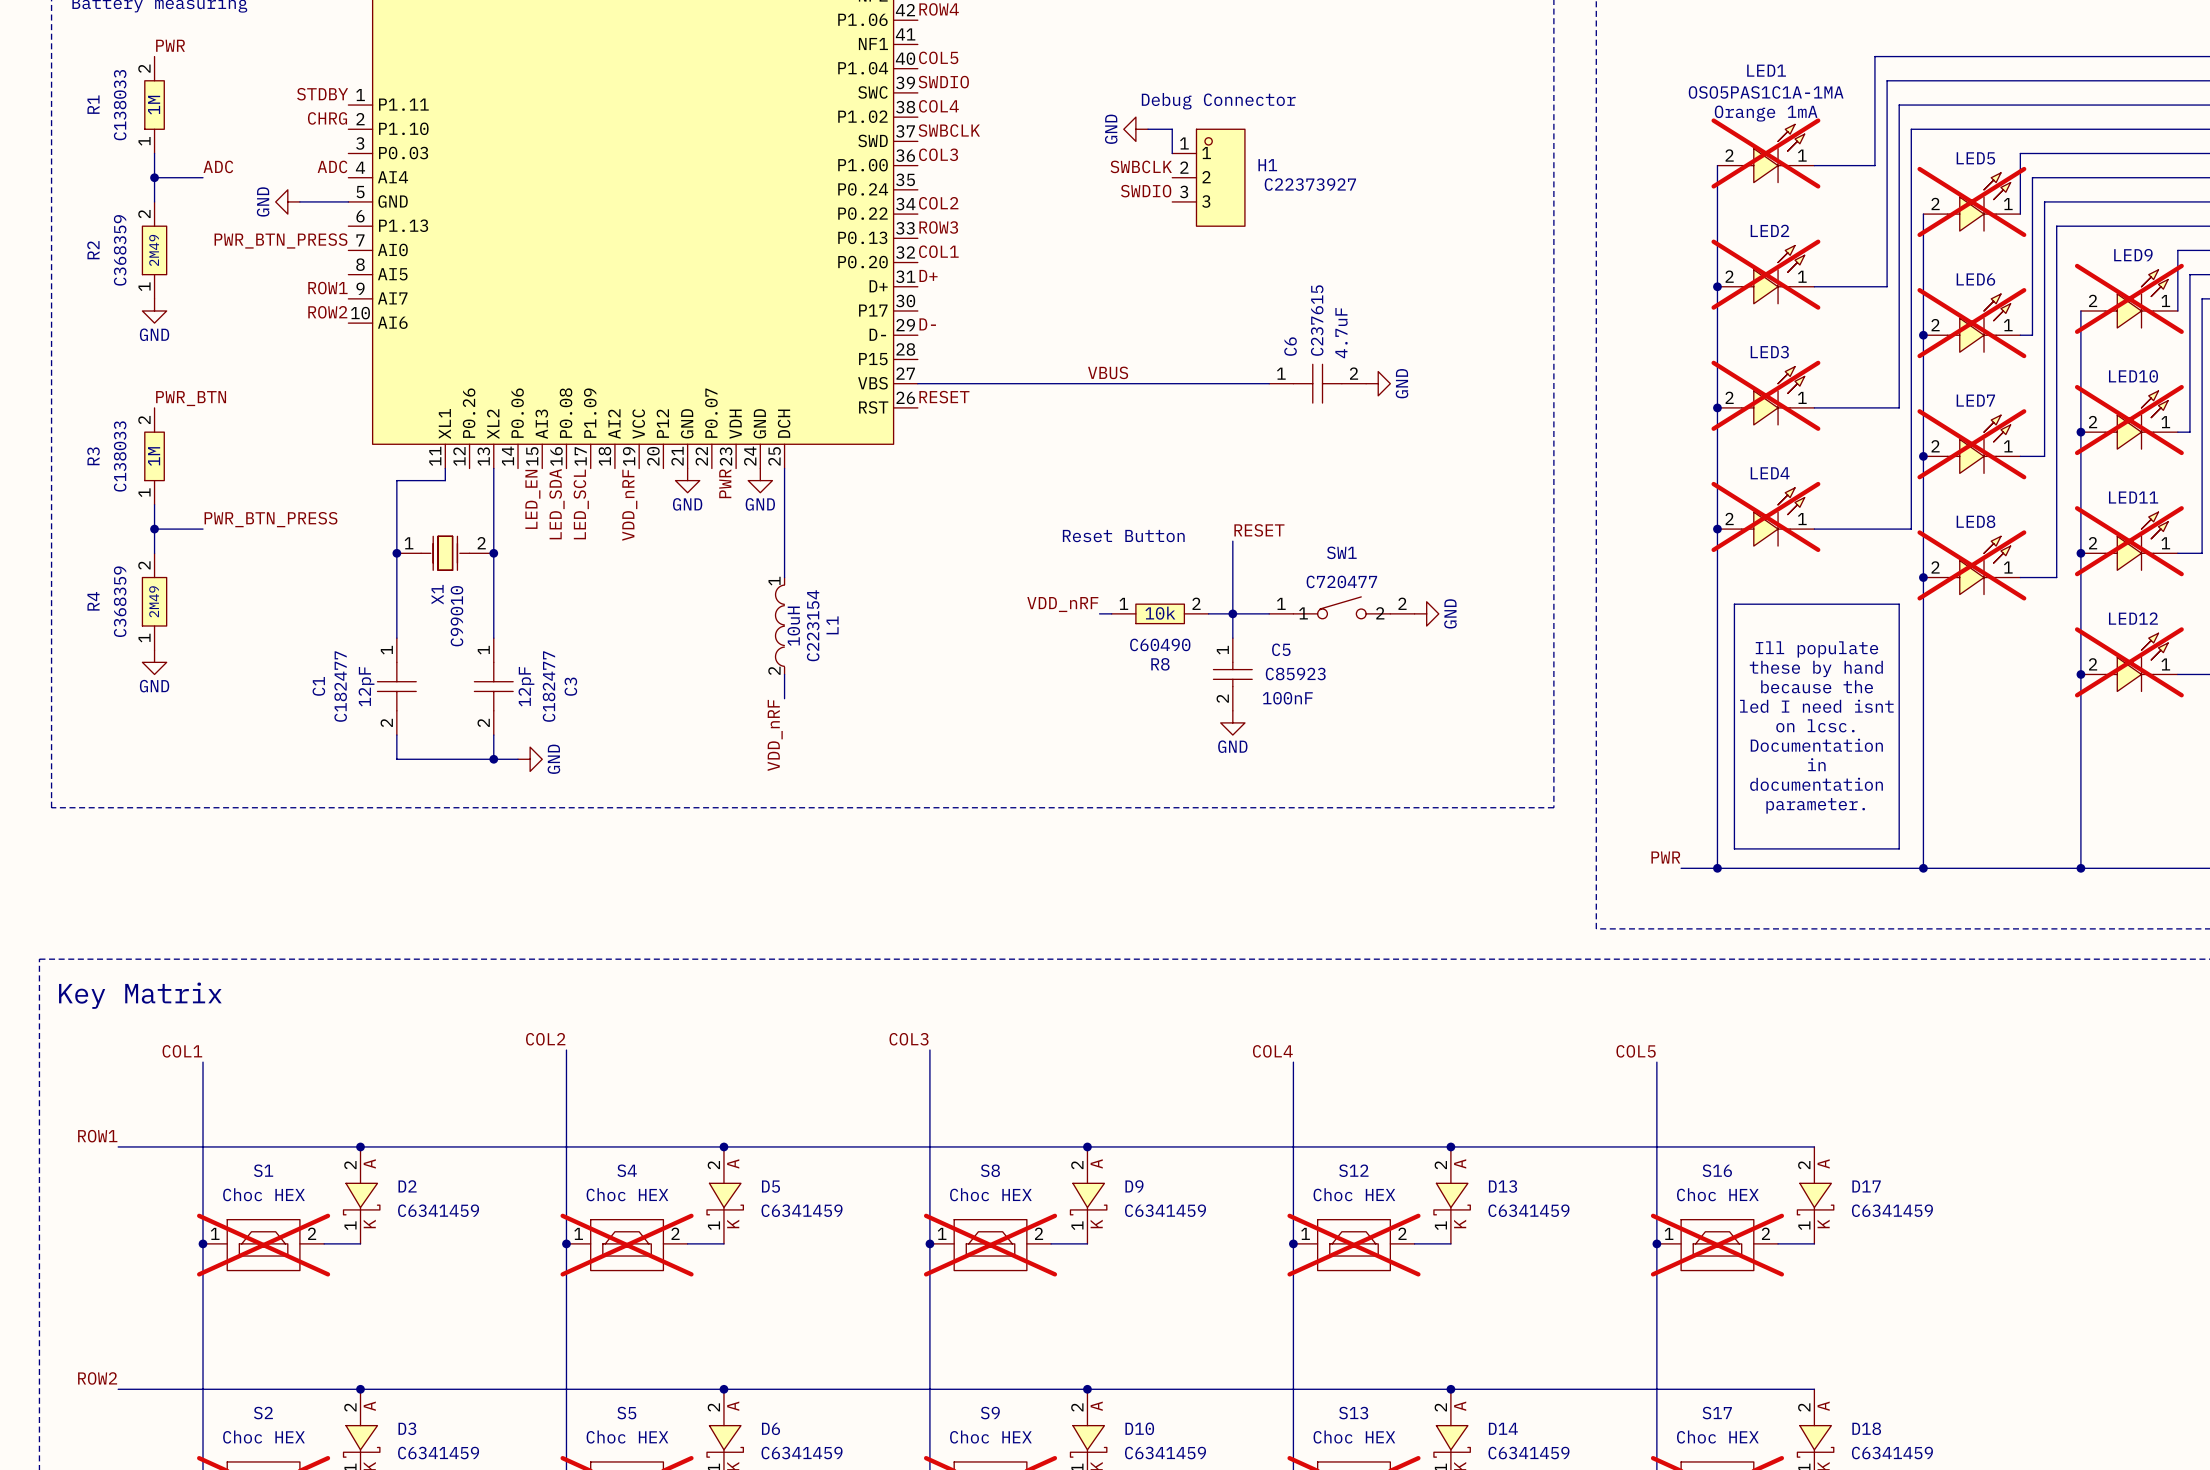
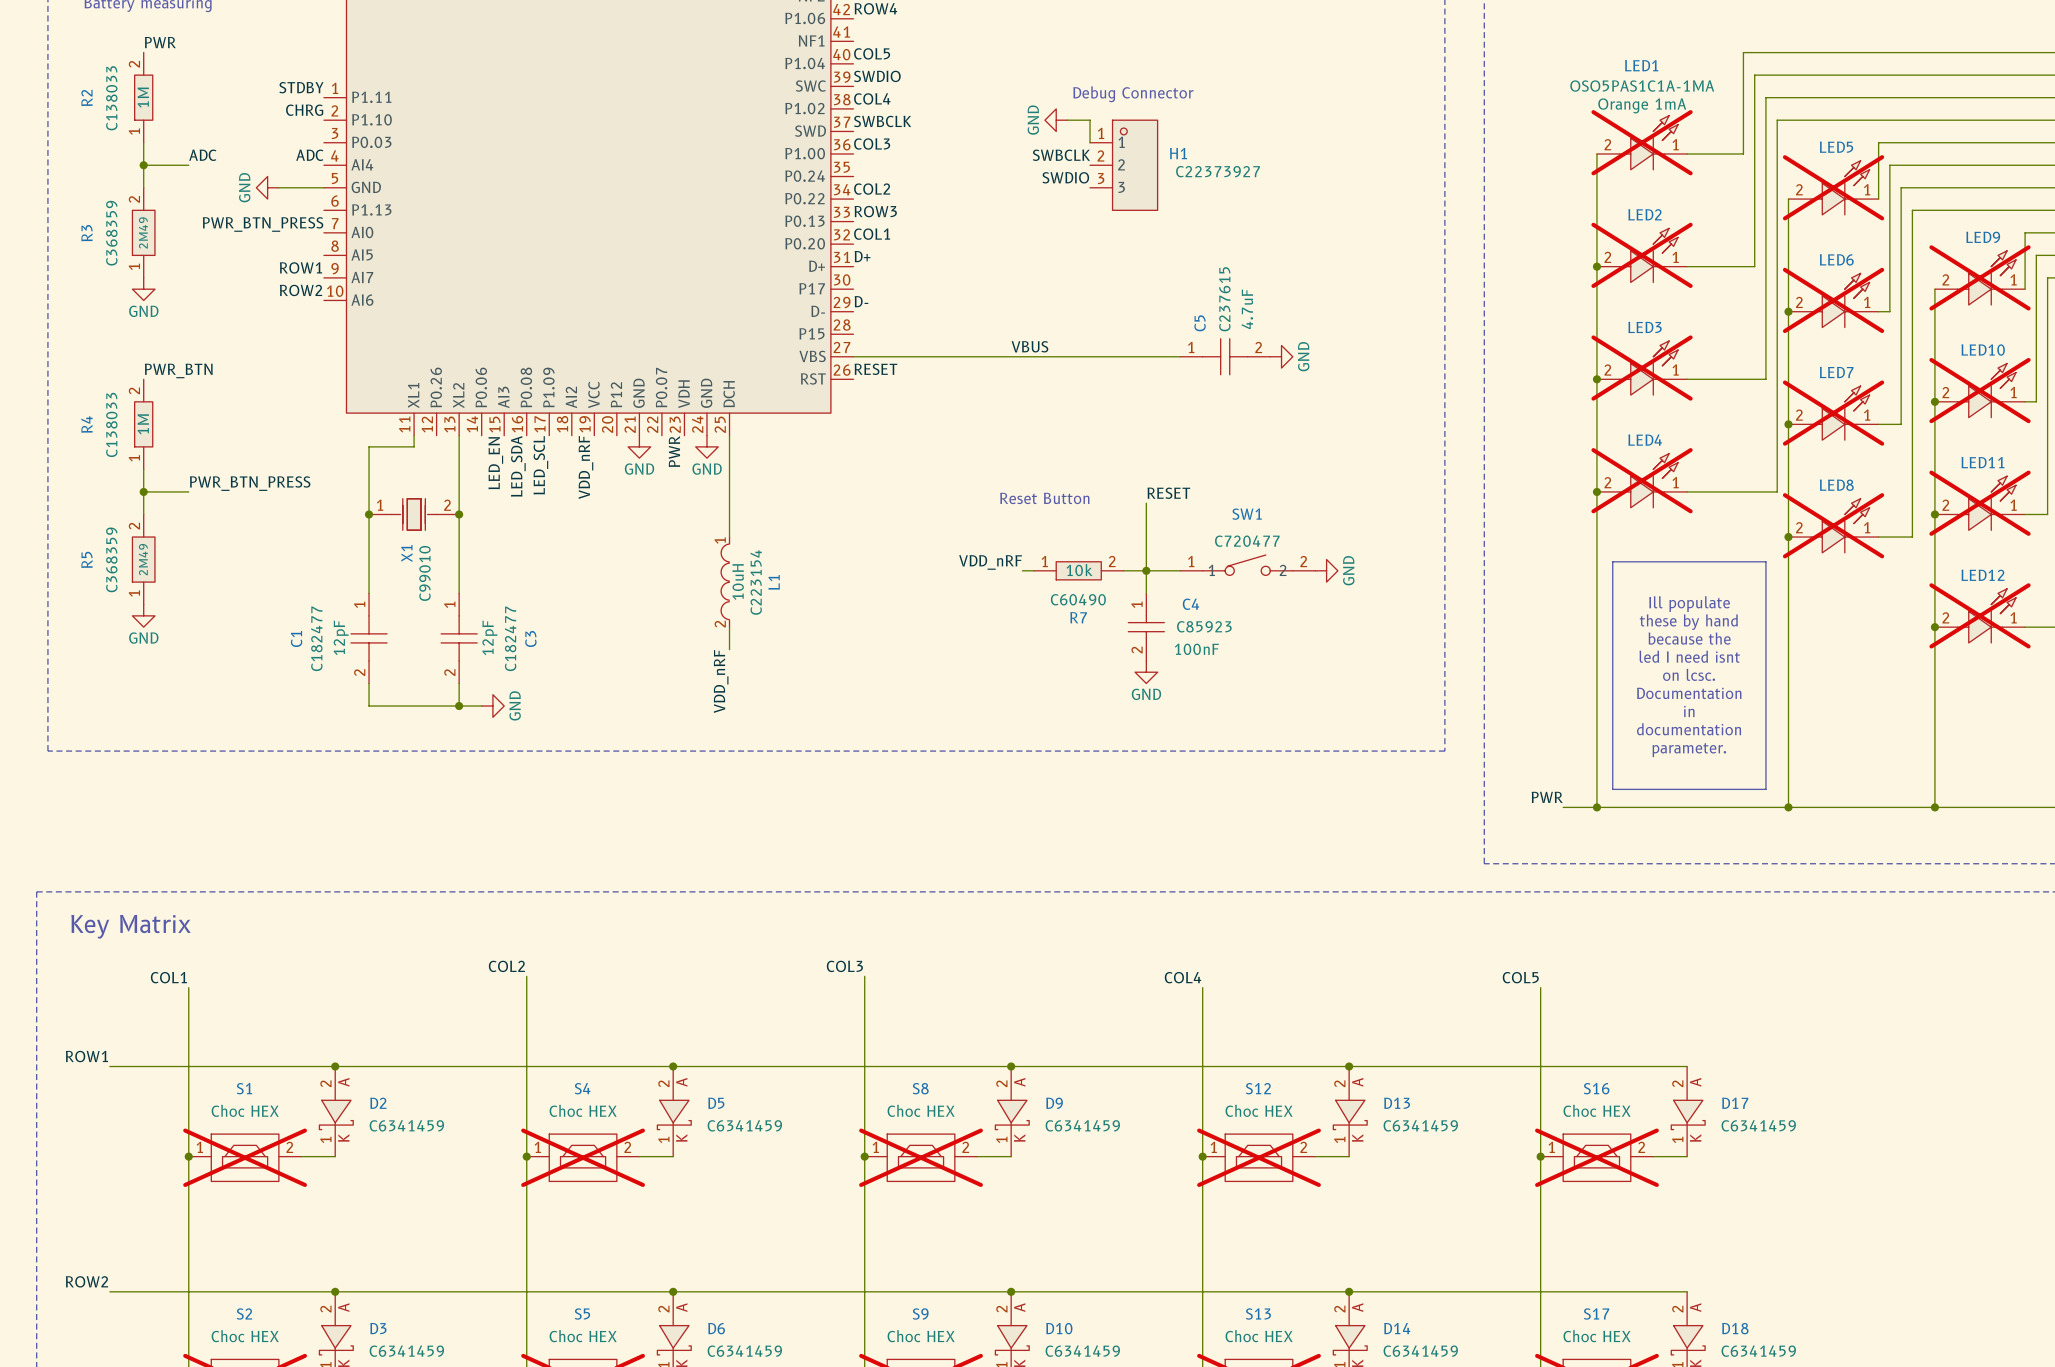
R1 name: R1 (93, 104) -> R2 (86, 97)
R2 name: R2 (93, 250) -> R3 (86, 233)
C6 name: C6 (1290, 346) -> C5 (1200, 323)
R3 name: R3 (93, 456) -> R4 (86, 424)
R4 name: R4 (93, 601) -> R5 (86, 559)
C5 name: C5 (1281, 649) -> C4 (1190, 604)
R8 name: R8 (1160, 664) -> R7 (1078, 617)

